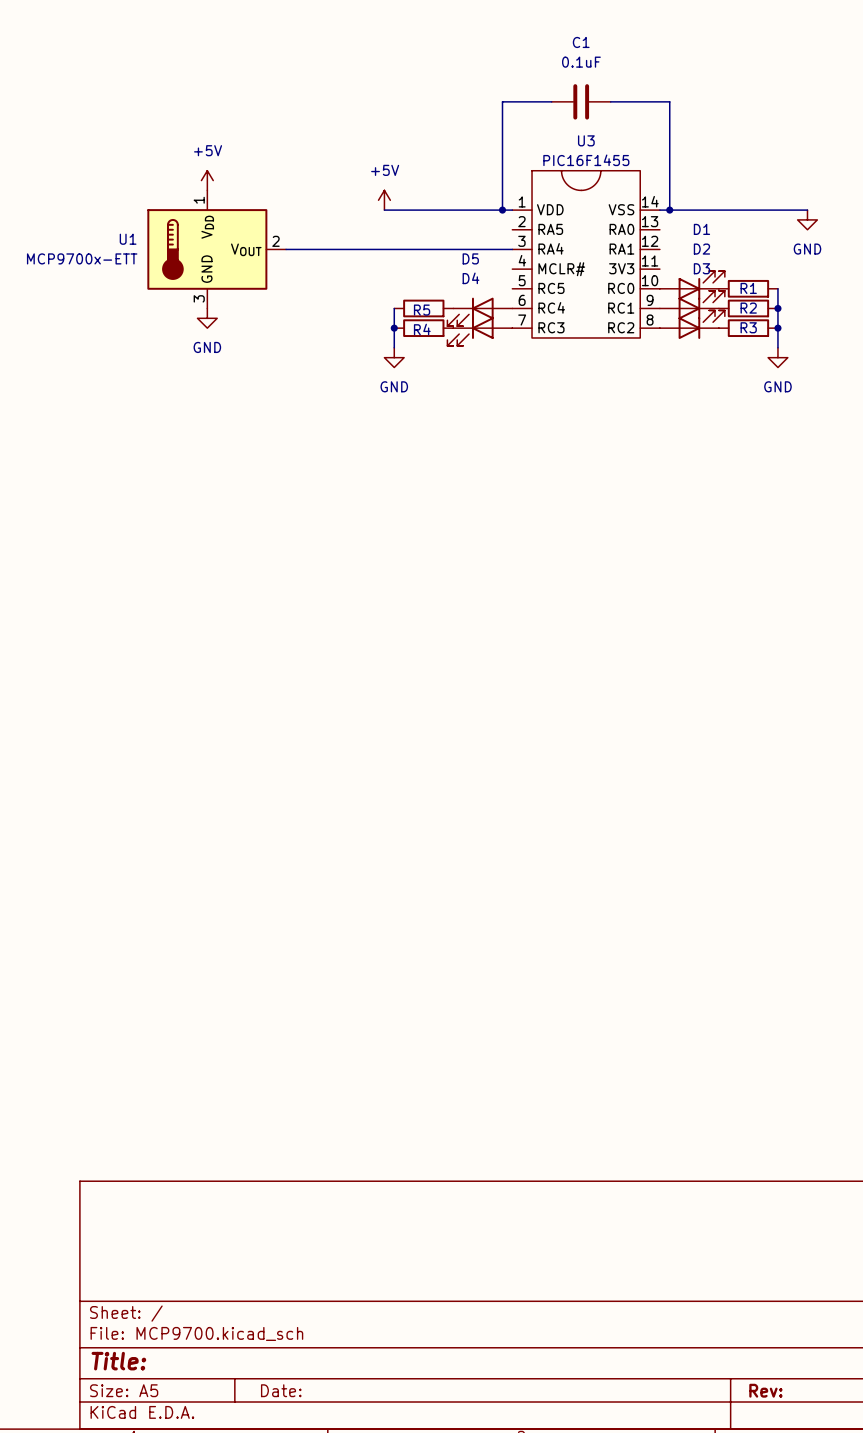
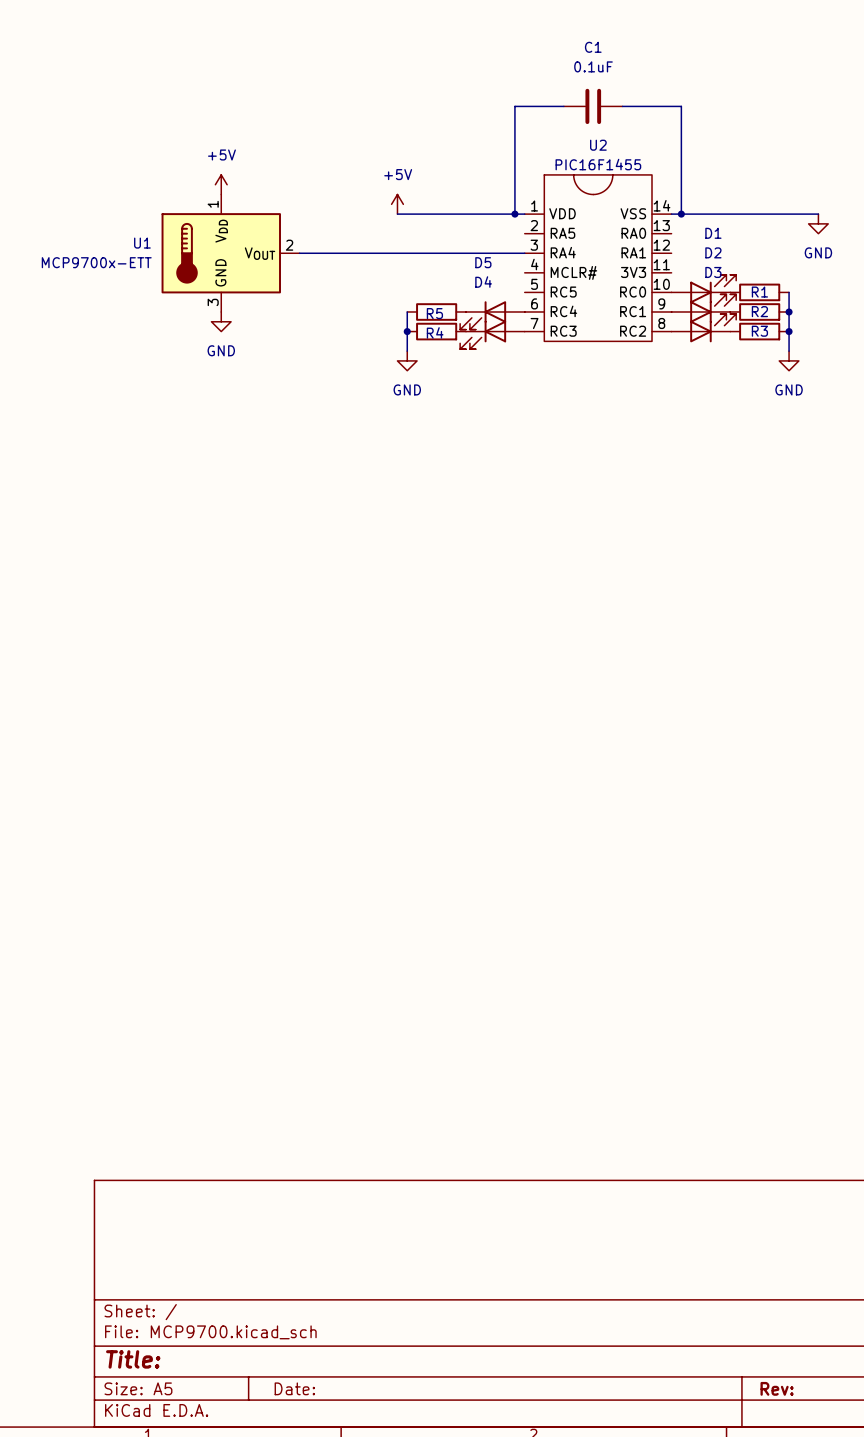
U3 name: U3 (586, 140) -> U2 (598, 145)

